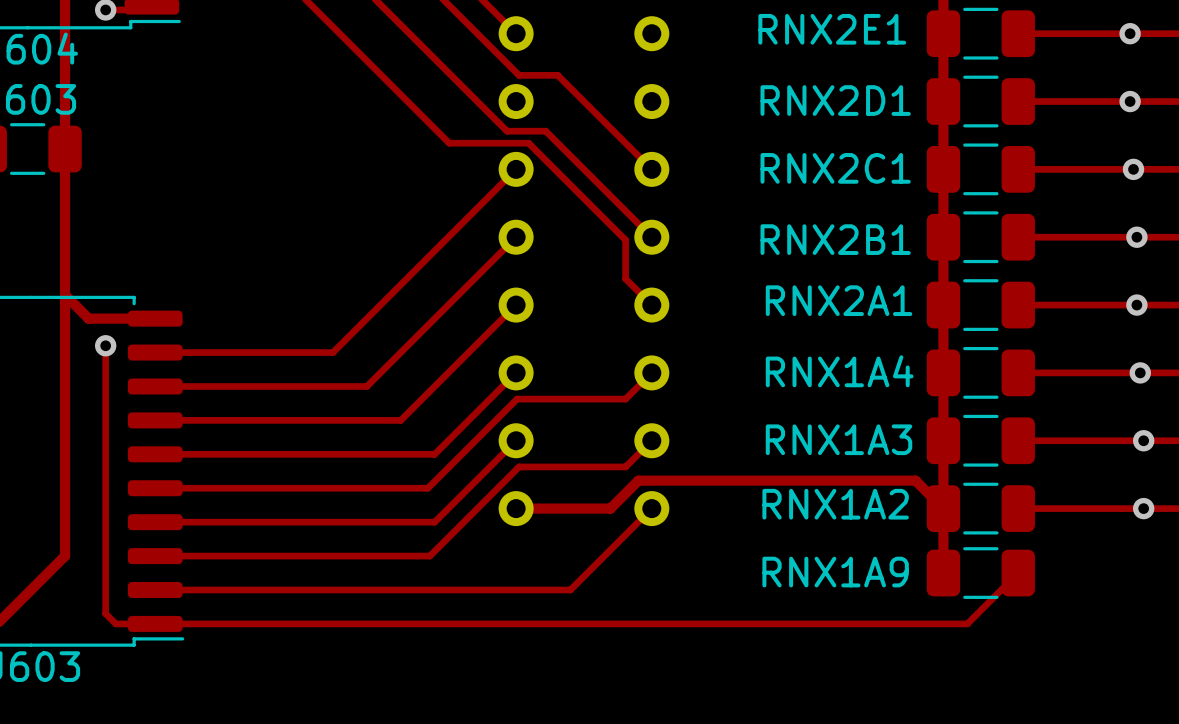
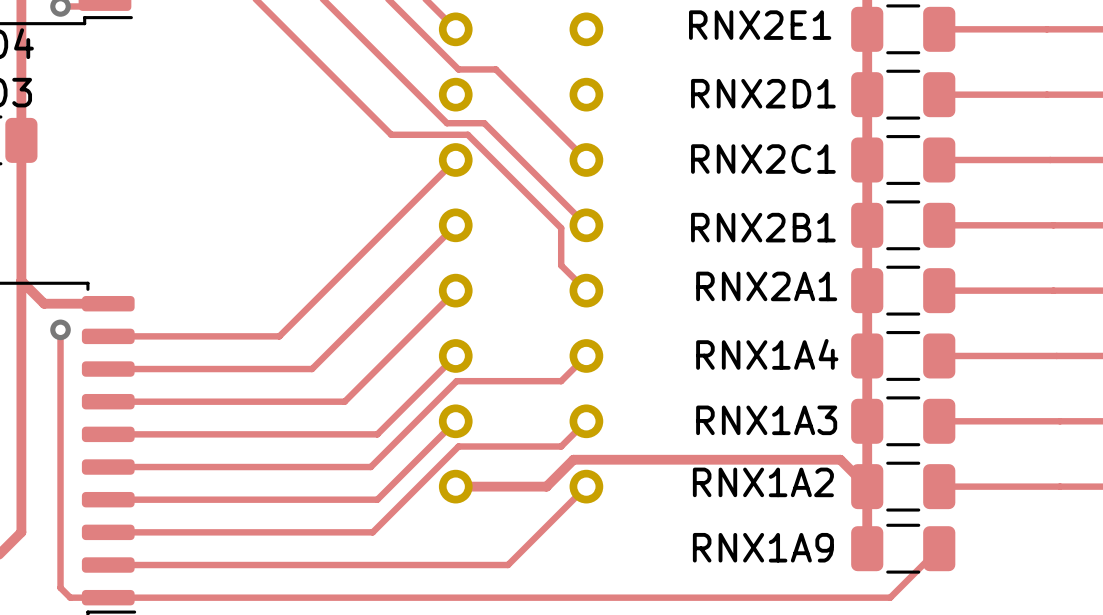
via: (1130, 33) -> none
via: (1130, 101) -> none
via: (1133, 169) -> none
via: (1136, 237) -> none
via: (1136, 305) -> none
via: (1140, 372) -> none
via: (1143, 440) -> none
via: (1143, 508) -> none

